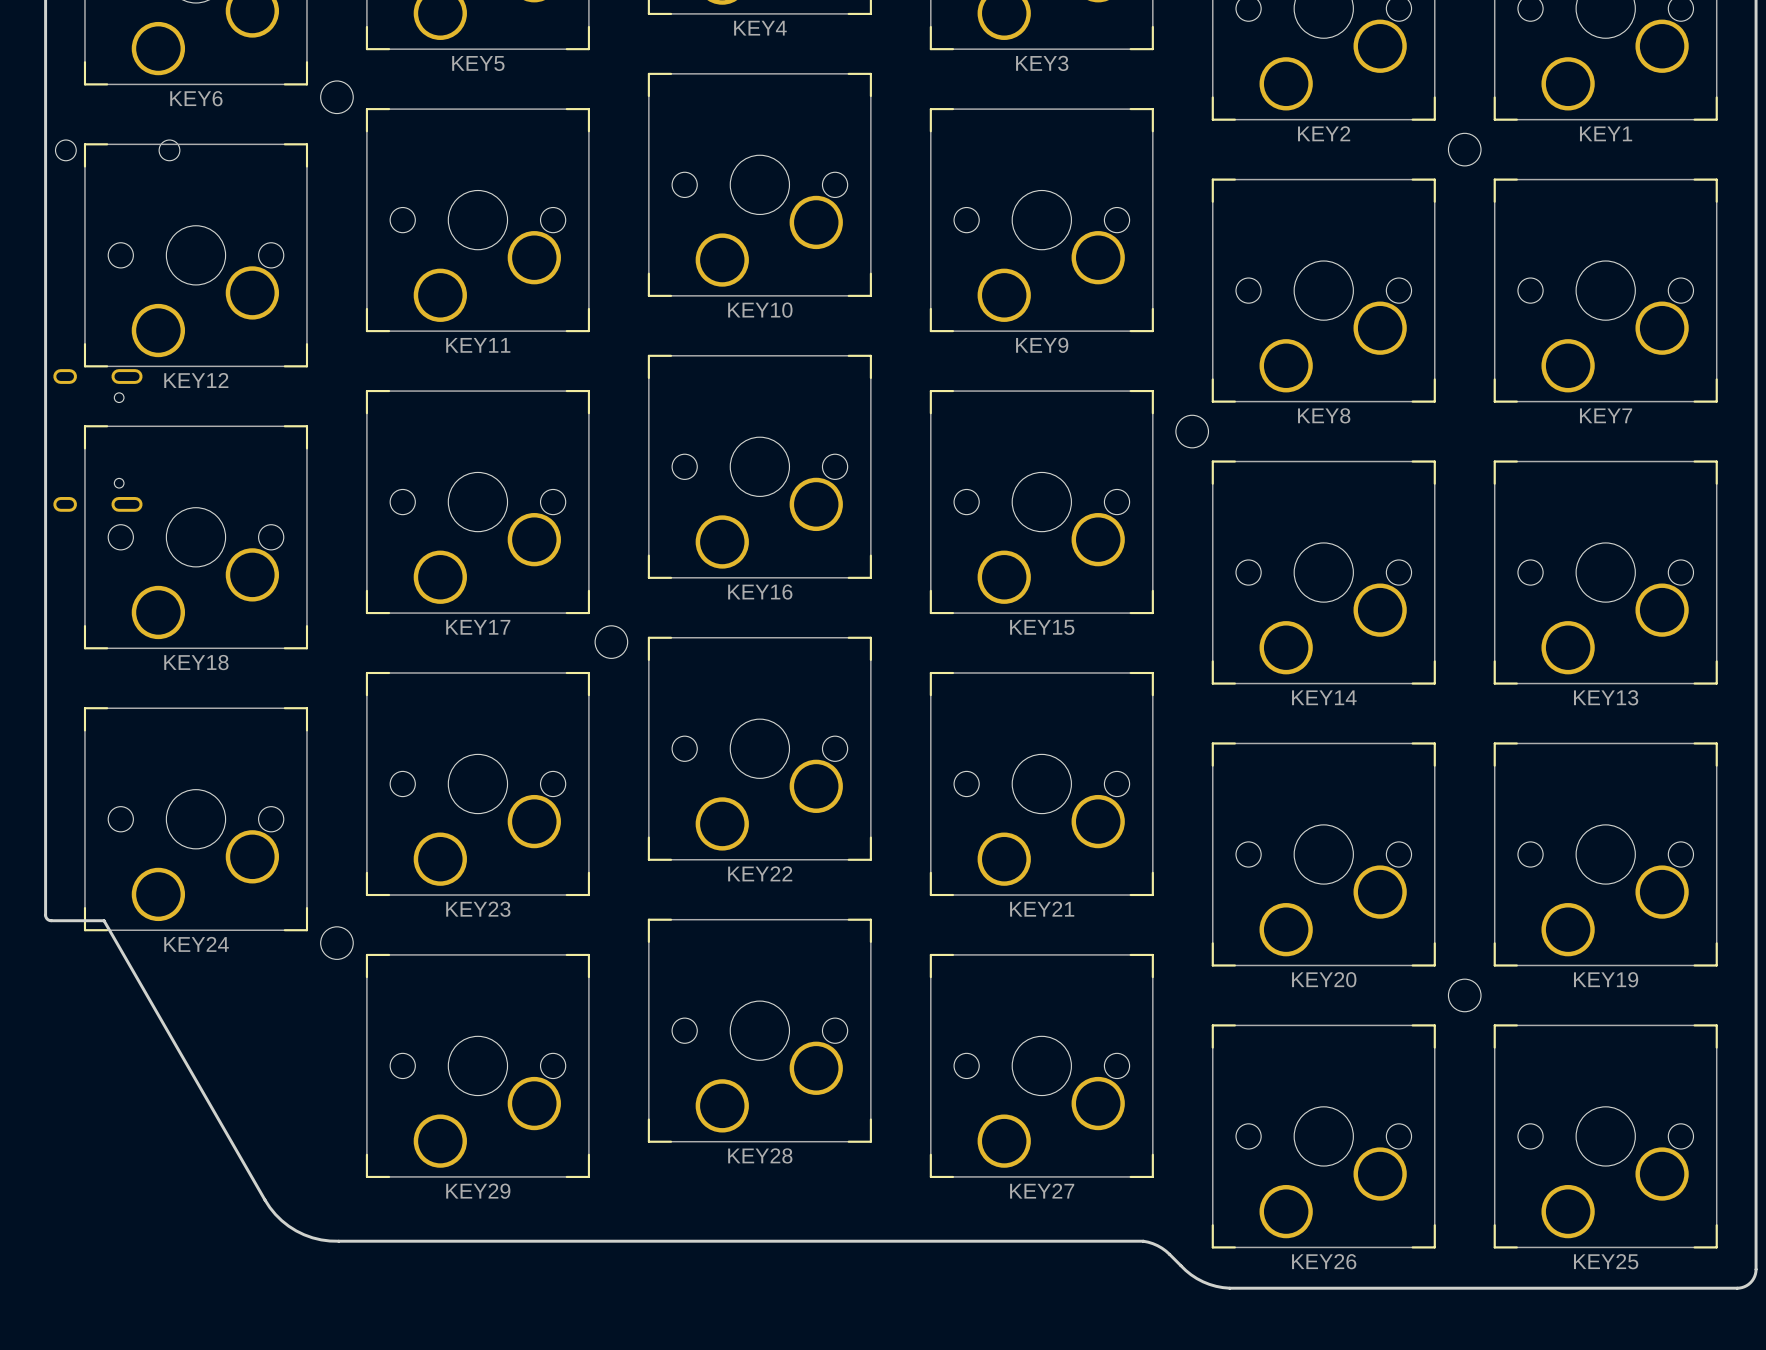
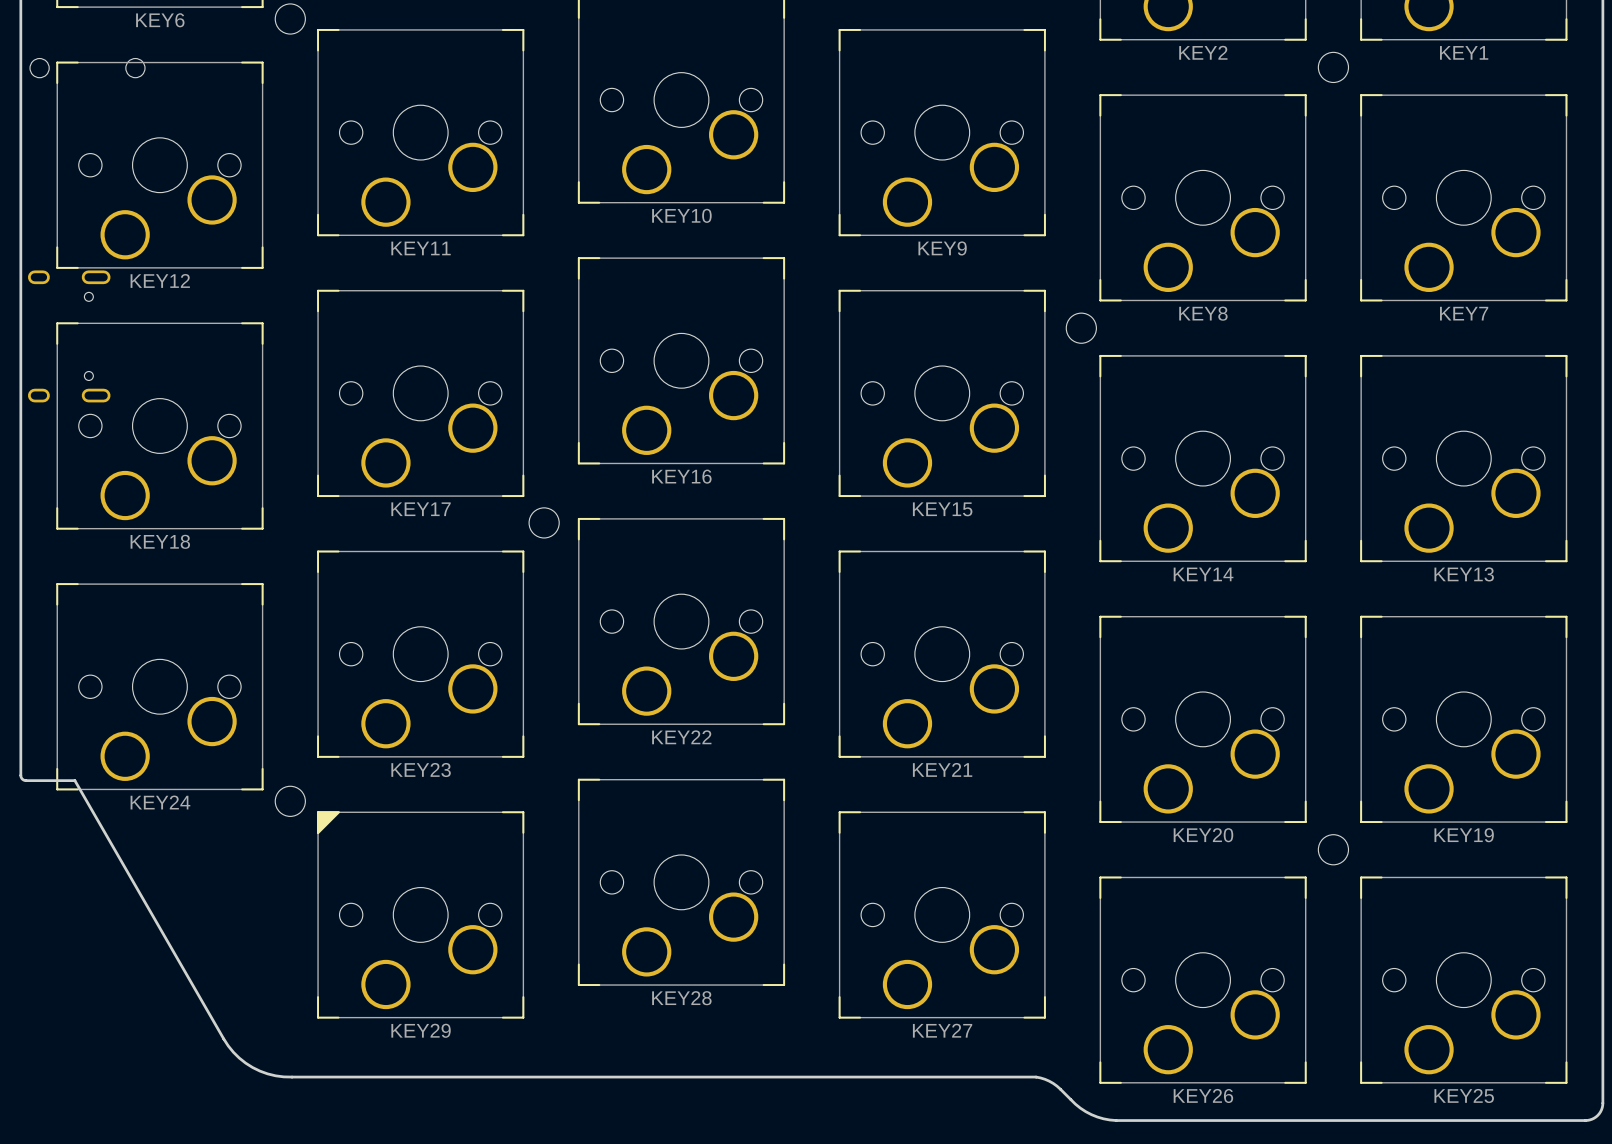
drawing: none -> [317, 811, 340, 835]

